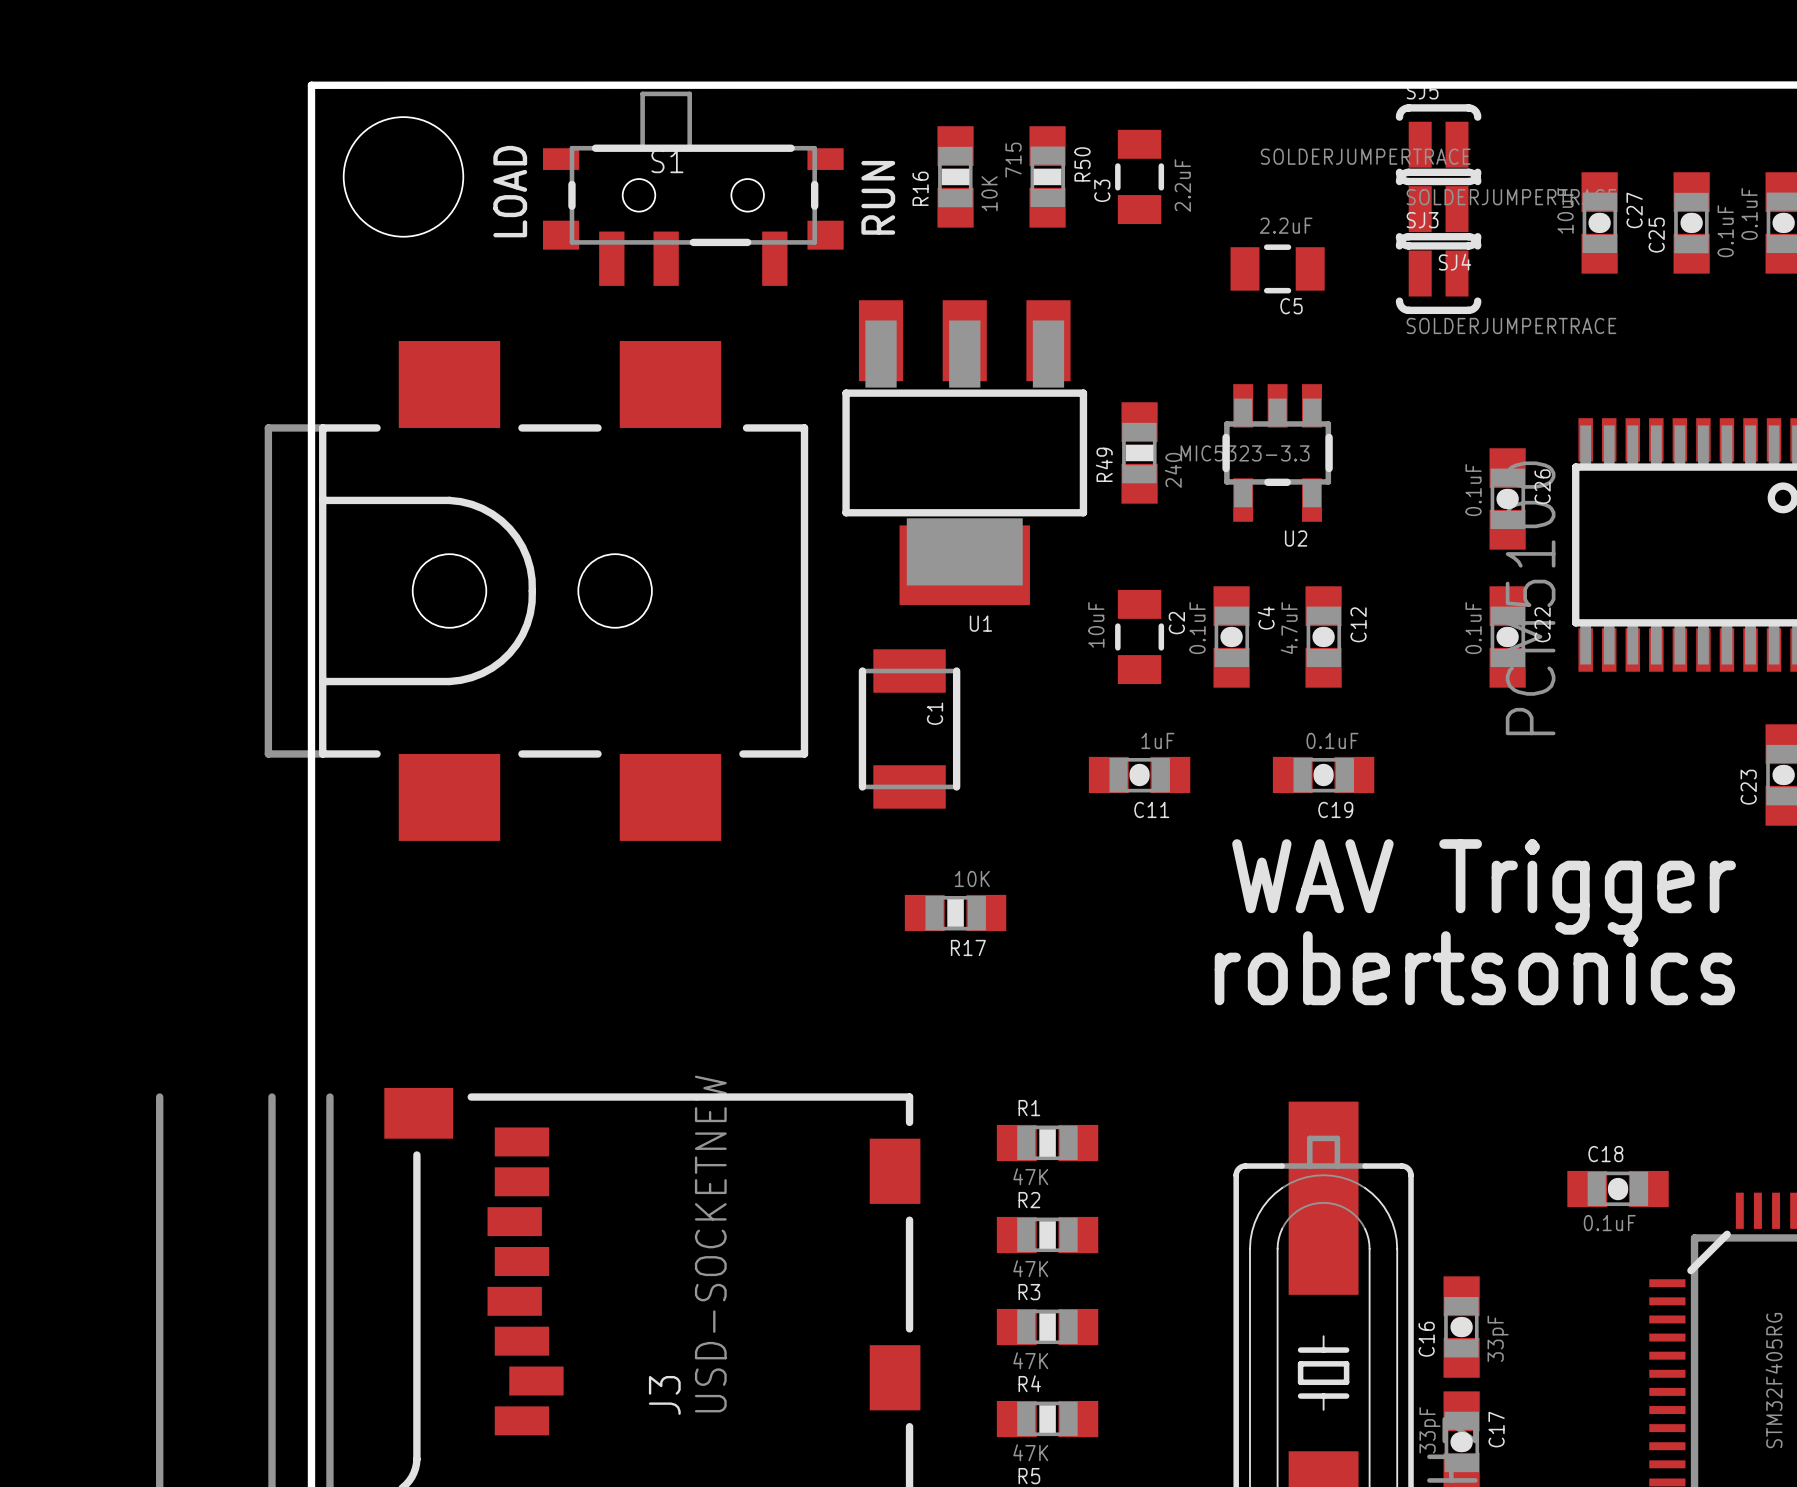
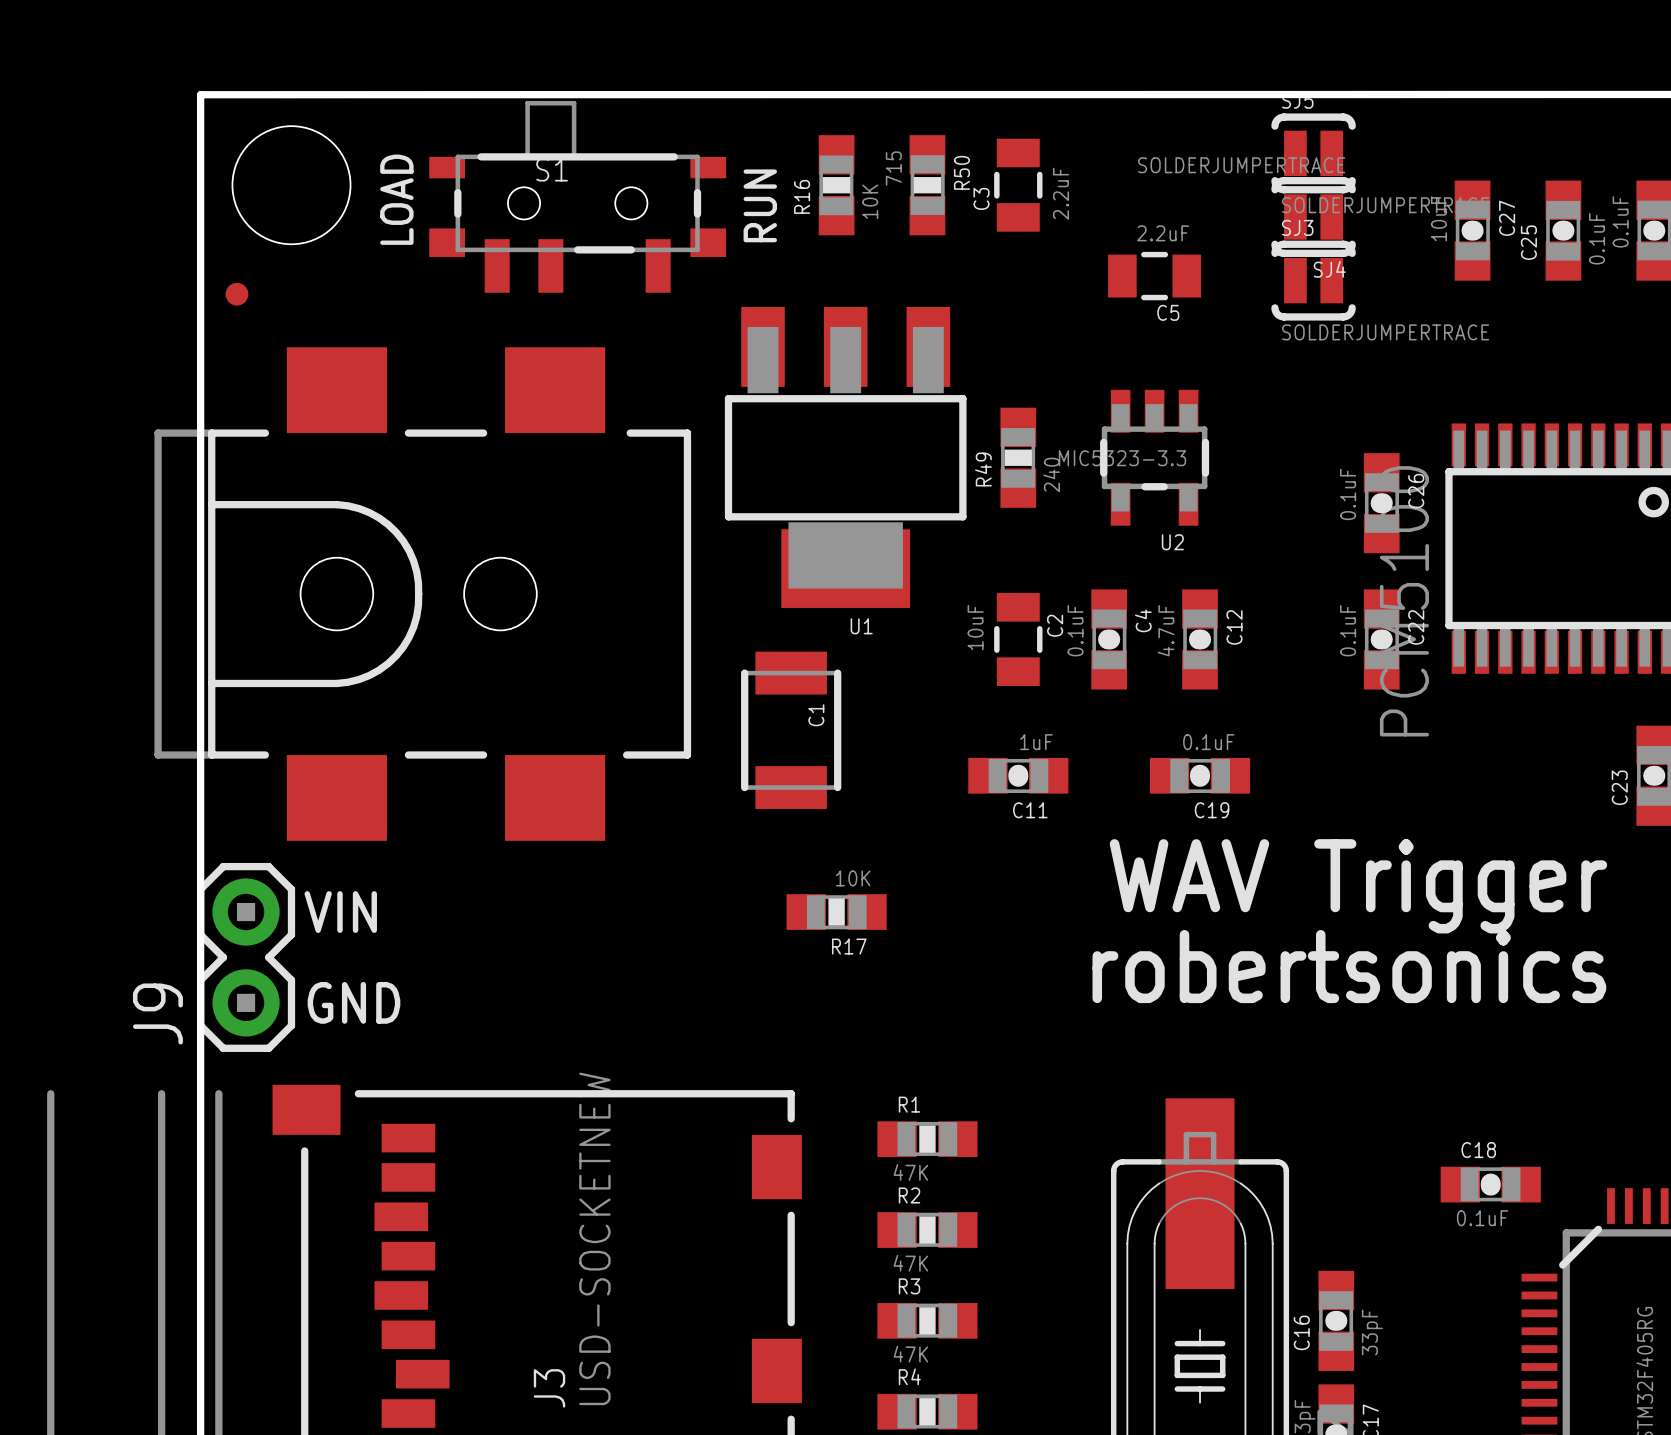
part: none -> (236, 294)
text: none -> VIN (340, 912)
J9: none -> (246, 957)
text: none -> GND (354, 1002)

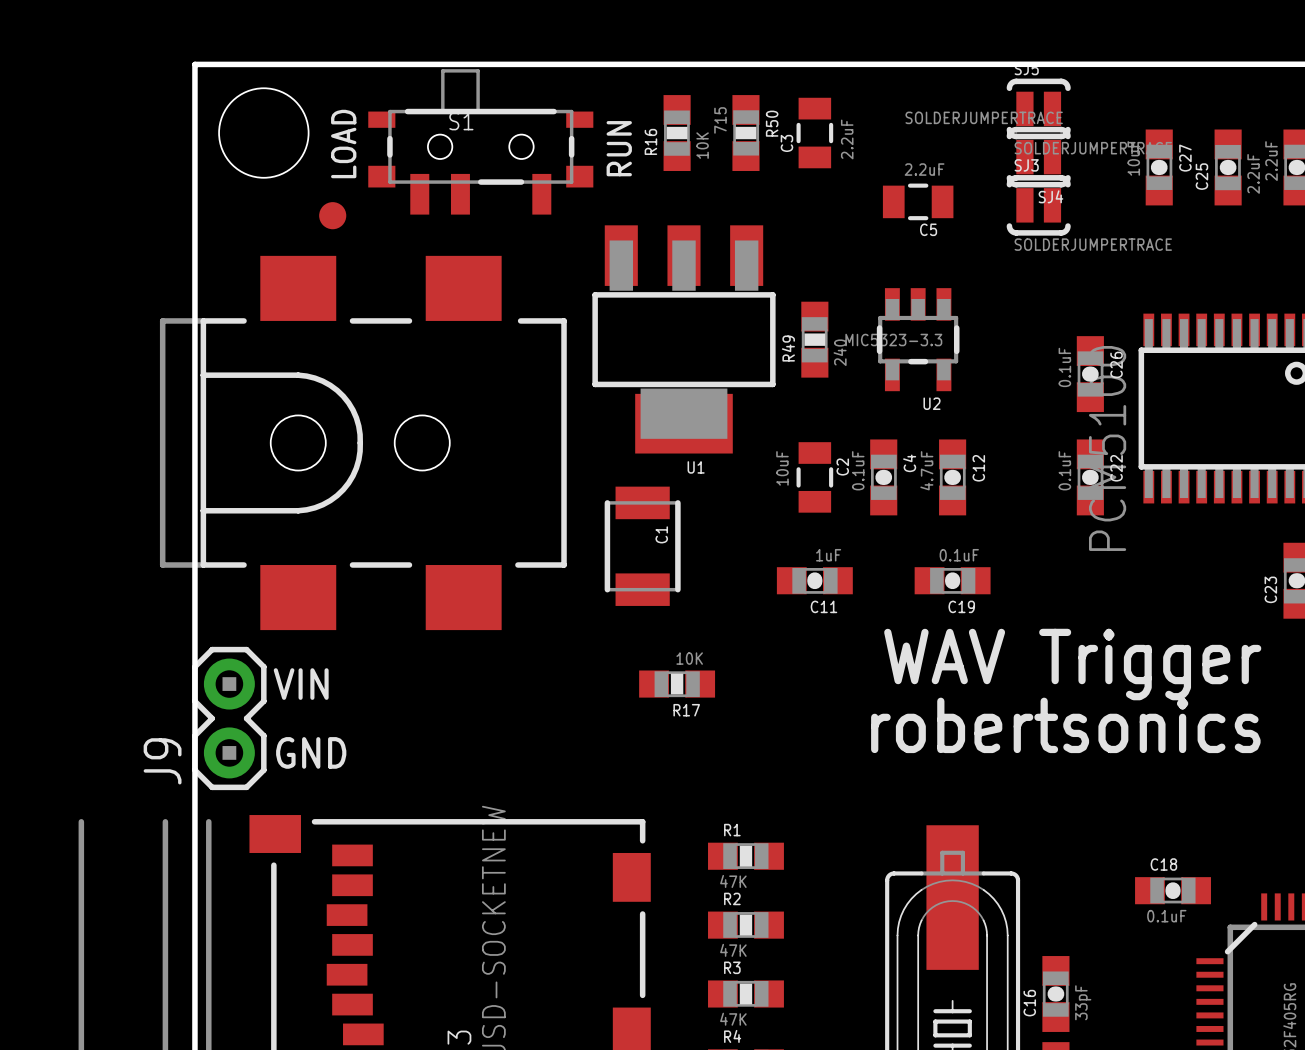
part value: 0.1uF (1620, 221) -> 2.2uF (1271, 161)
C25 value: 0.1uF (1597, 238) -> 2.2uF (1253, 173)
part: (236, 294) -> none
part: none -> (332, 215)

